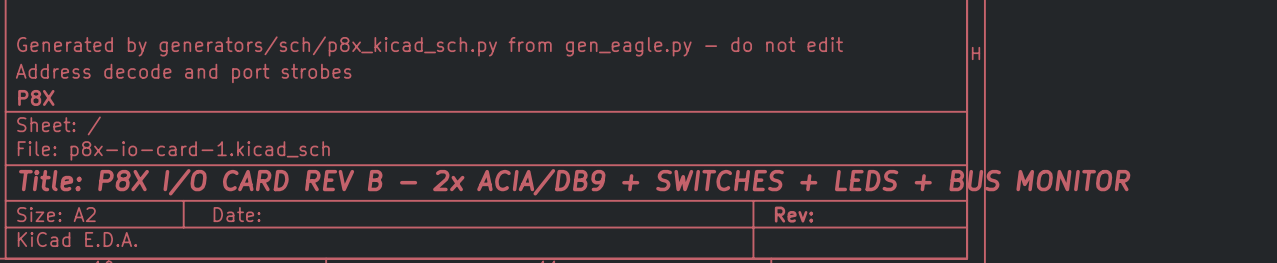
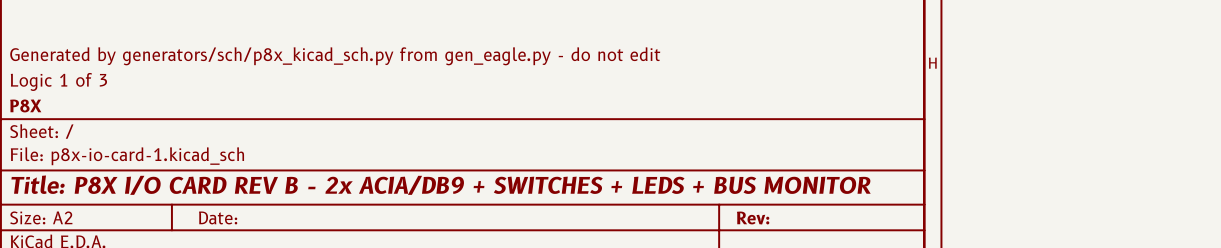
title block: Address decode and port strobes (183, 73) -> Logic 1 of 3 (58, 81)

